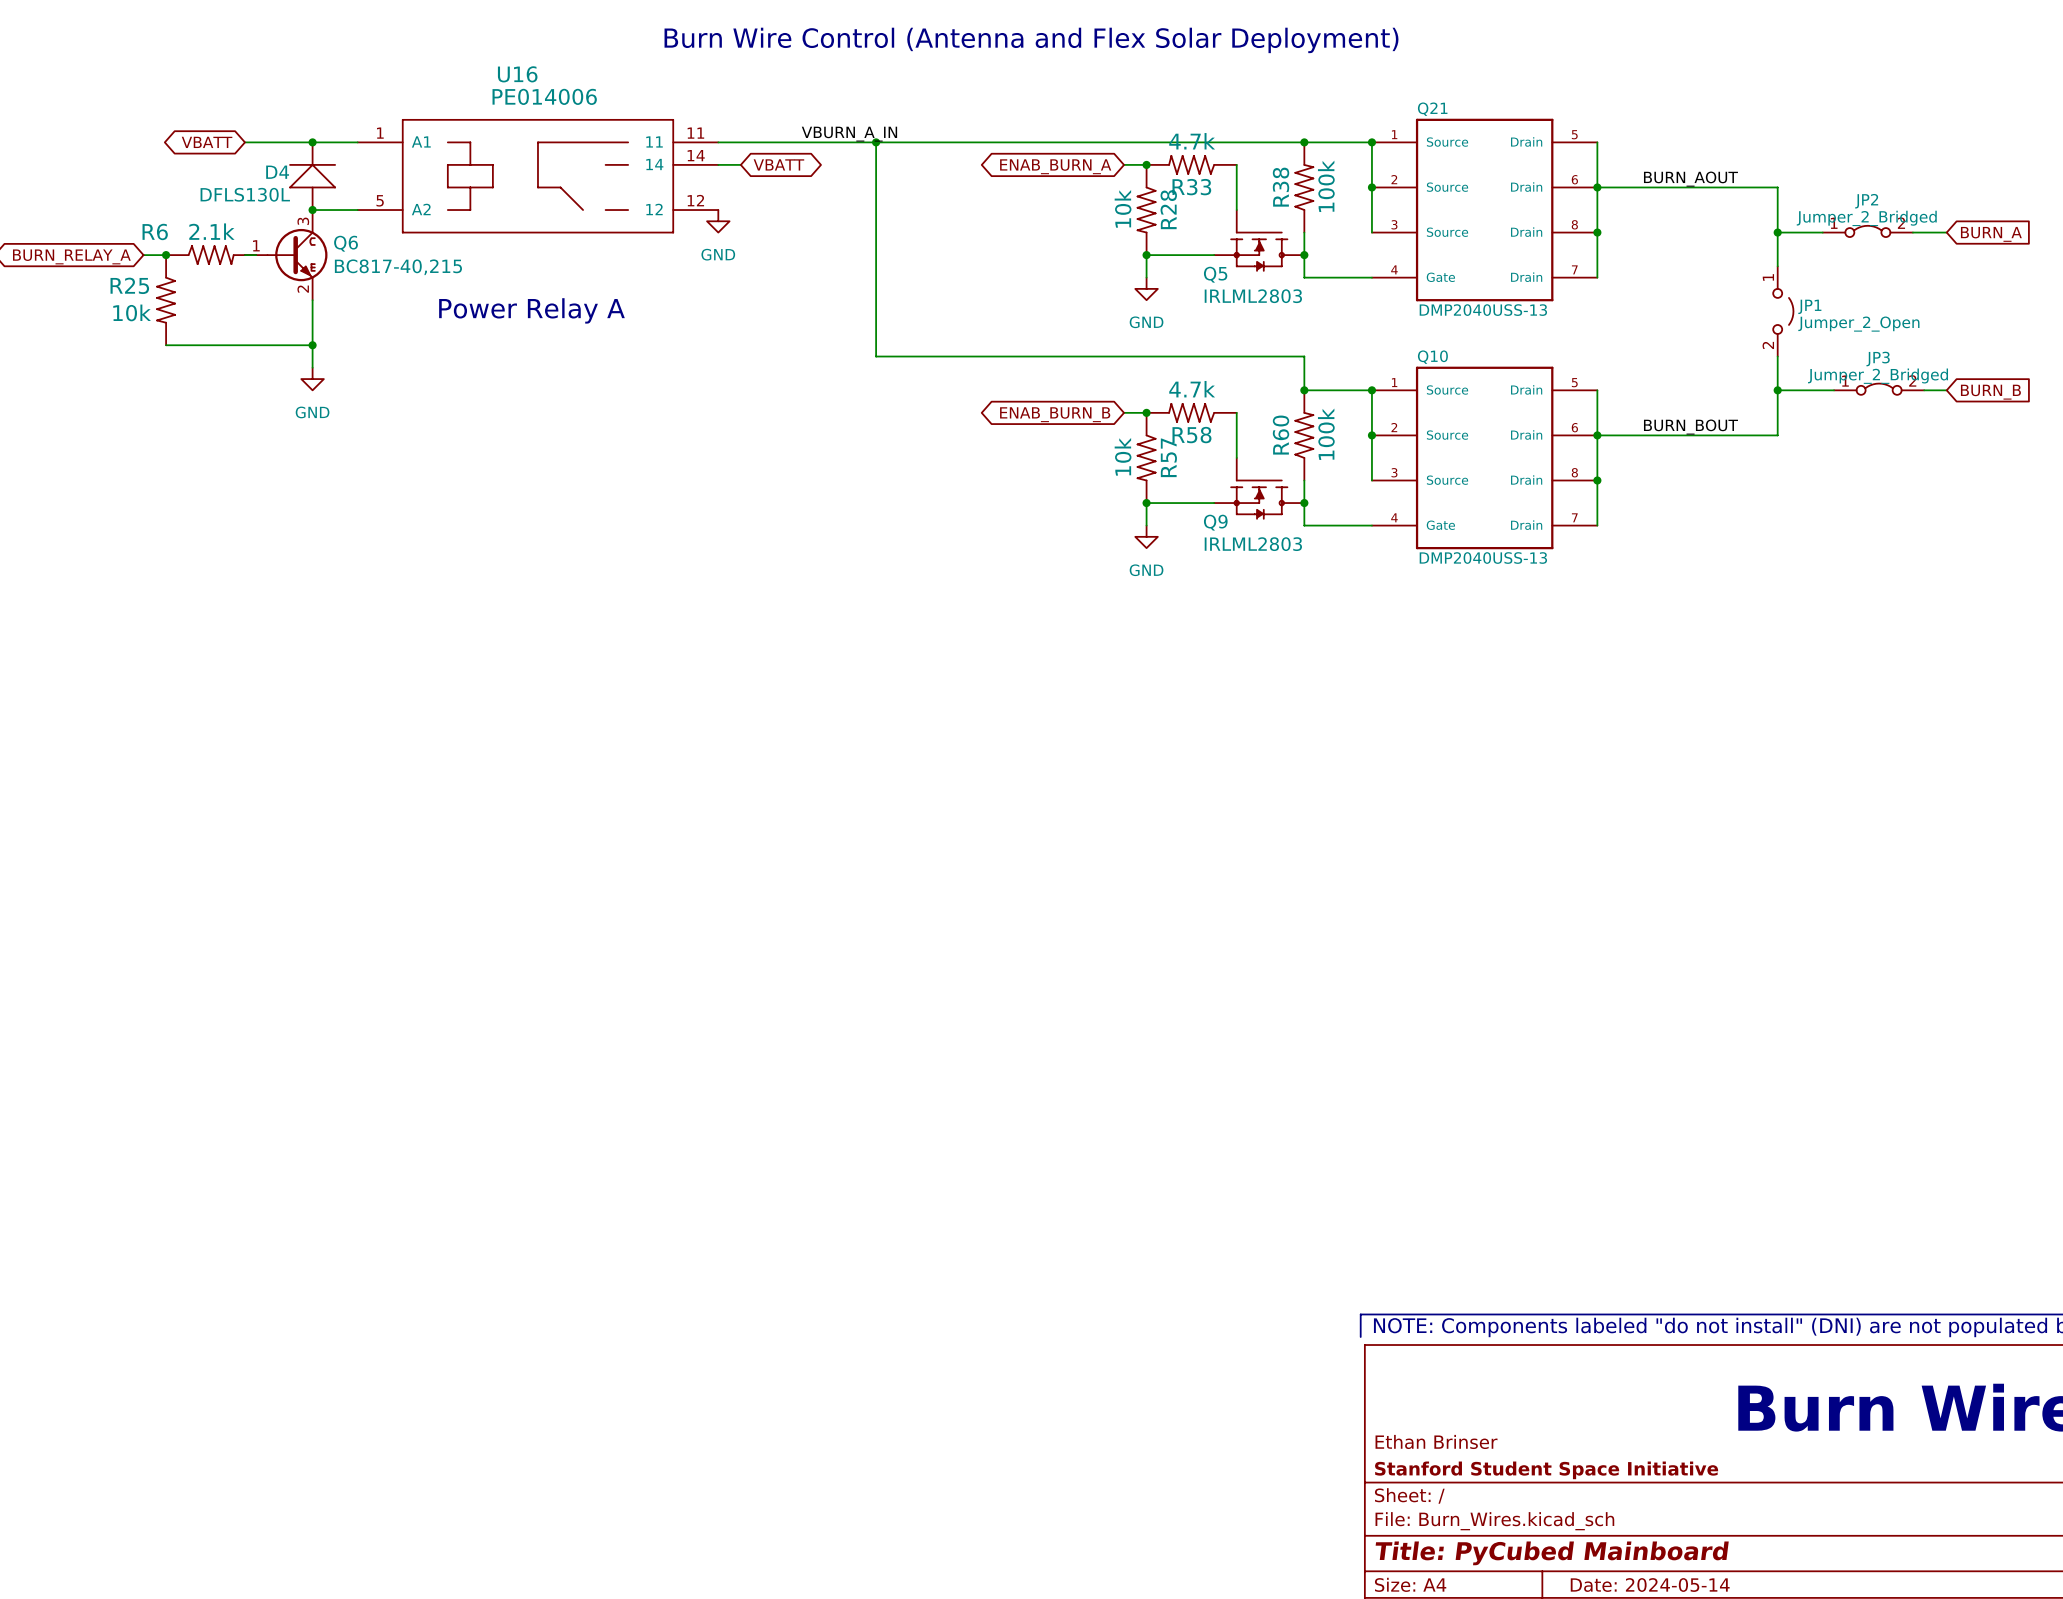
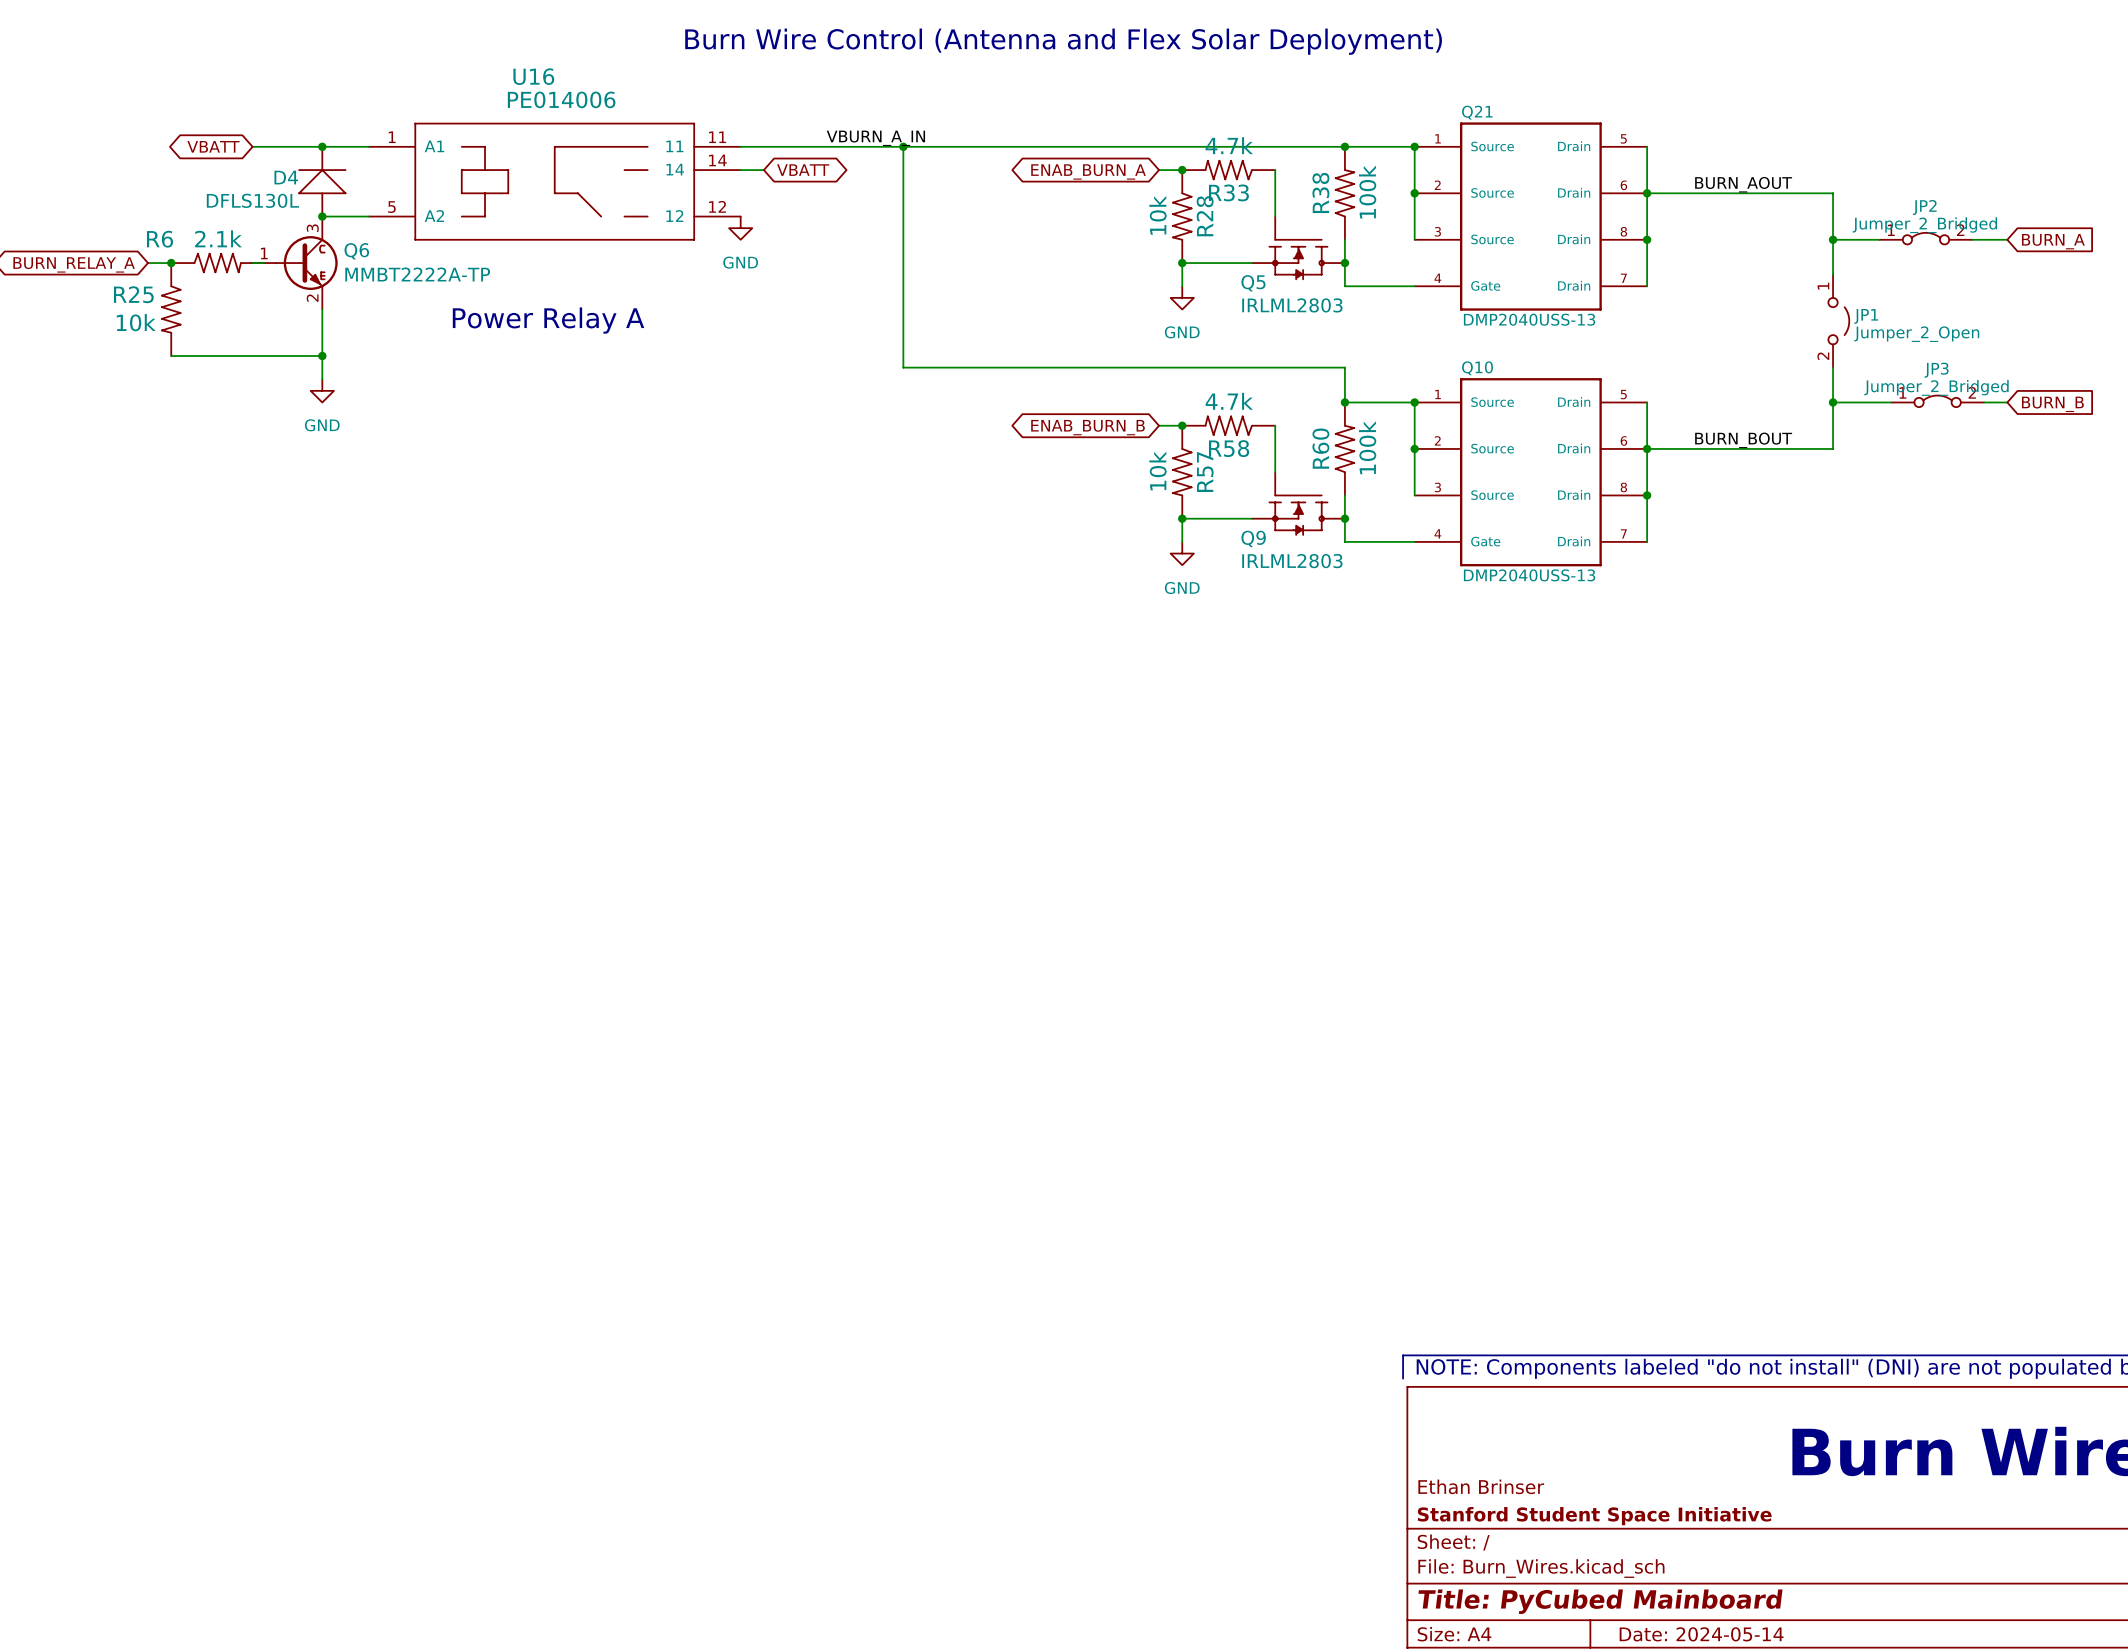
Q6 value: BC817-40,215 (398, 267) -> MMBT2222A-TP (417, 274)

